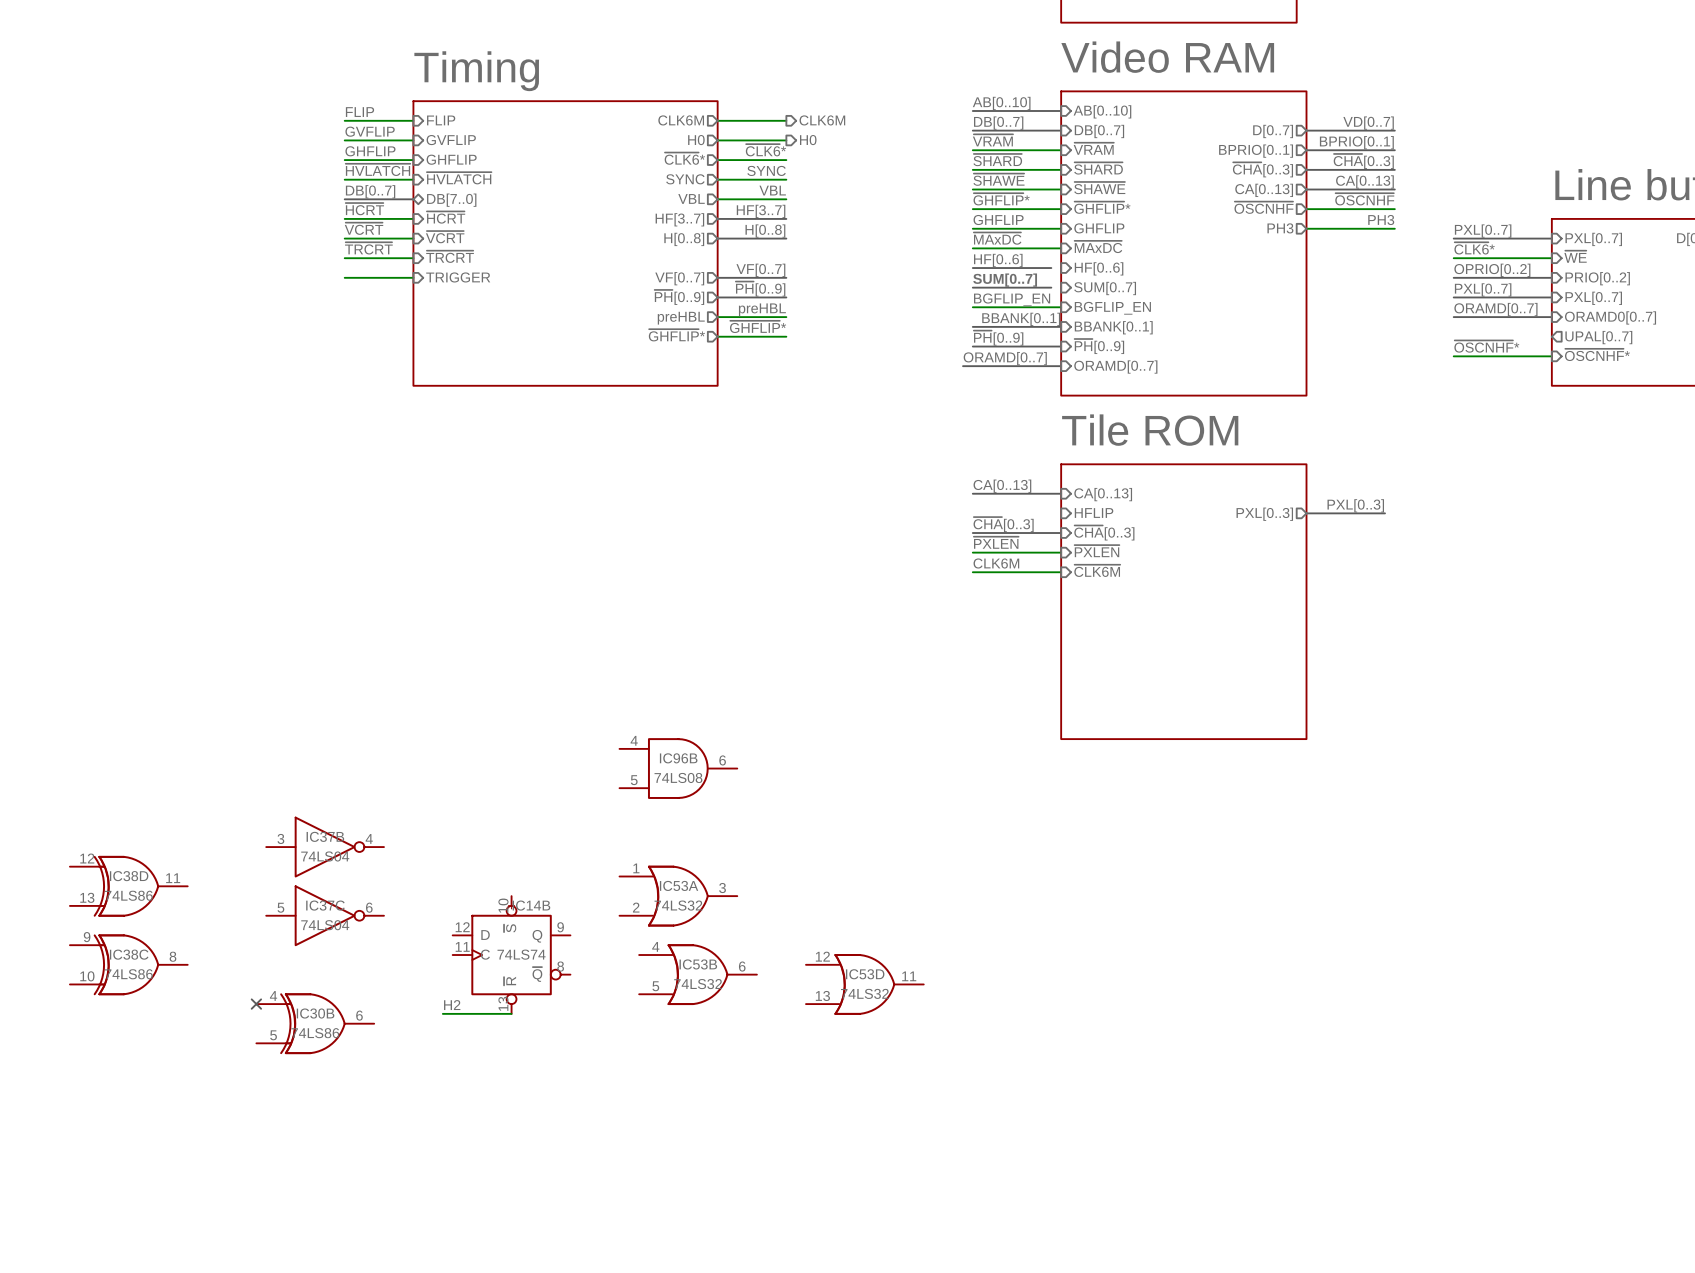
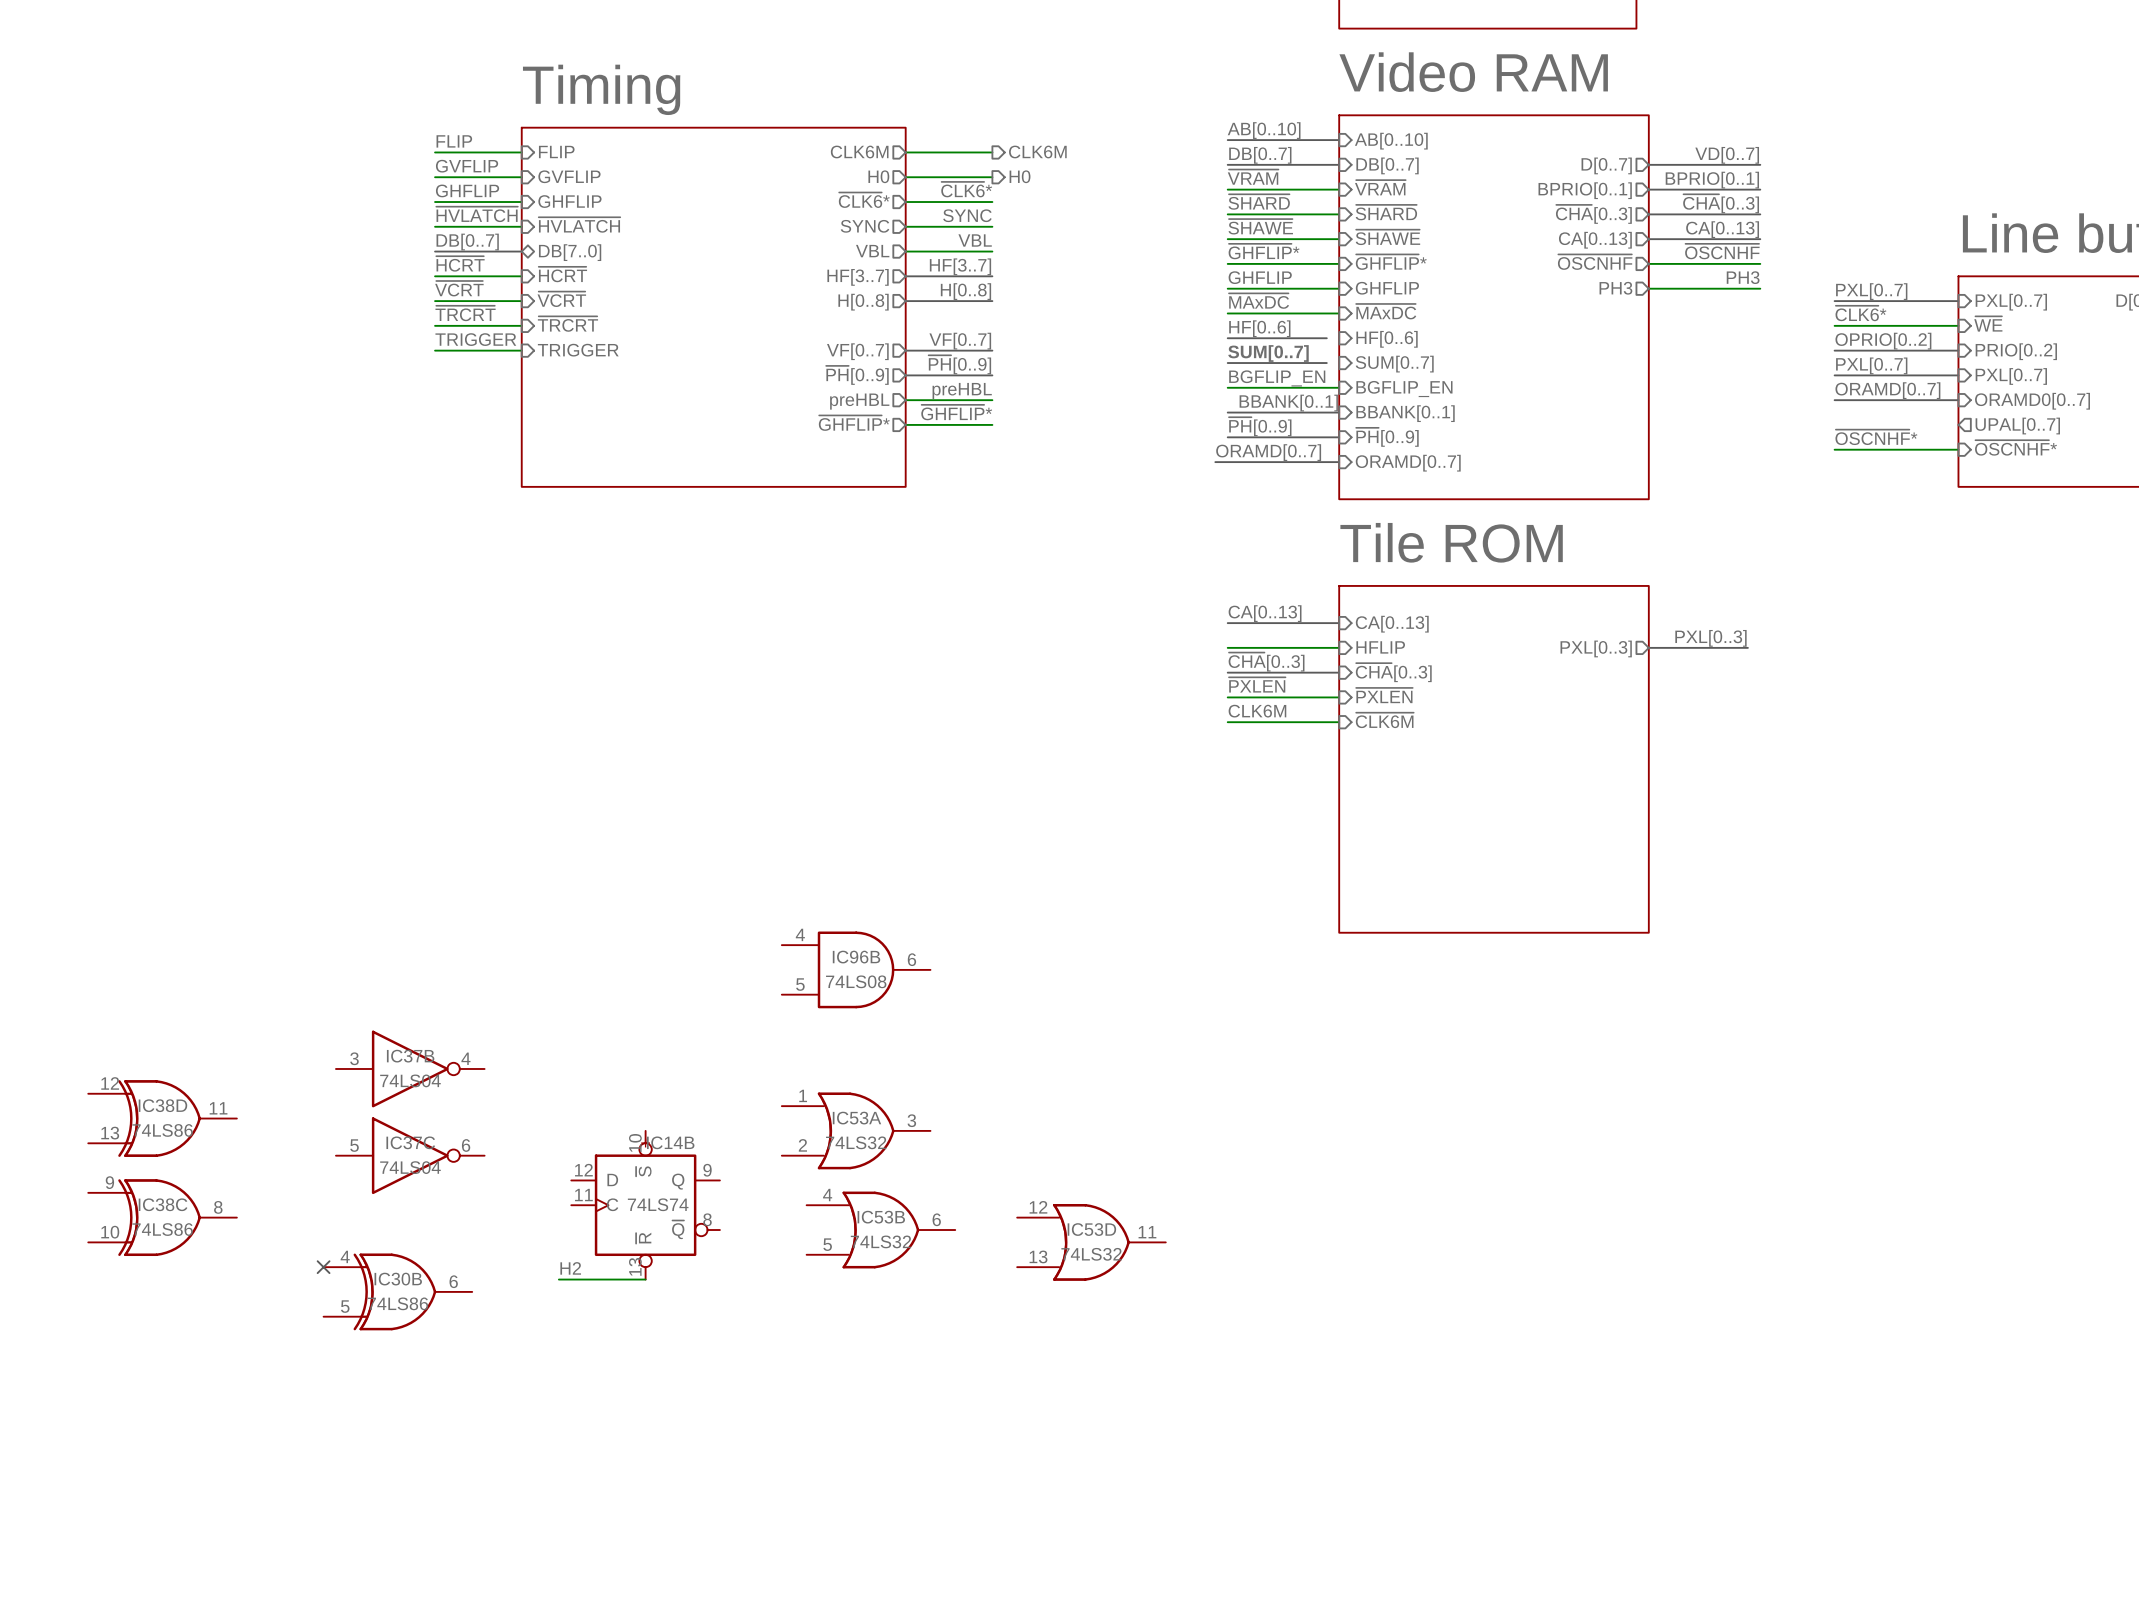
label: none -> TRIGGER (475, 339)
wire: none -> (1227, 647) (1339, 647)

